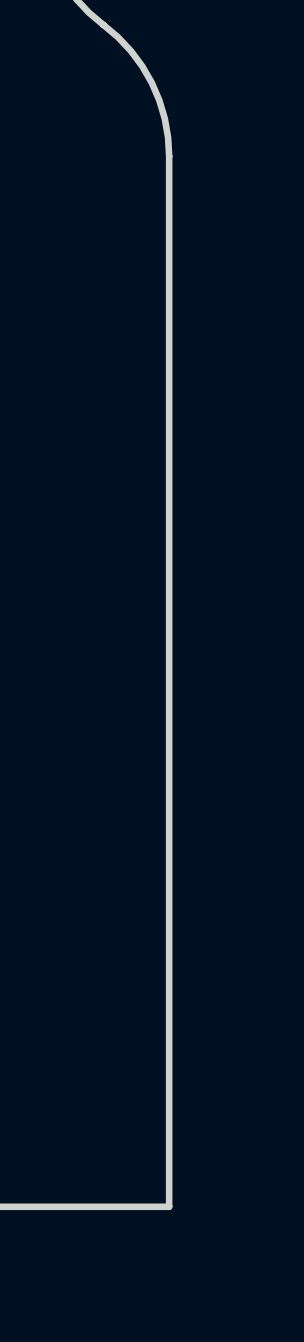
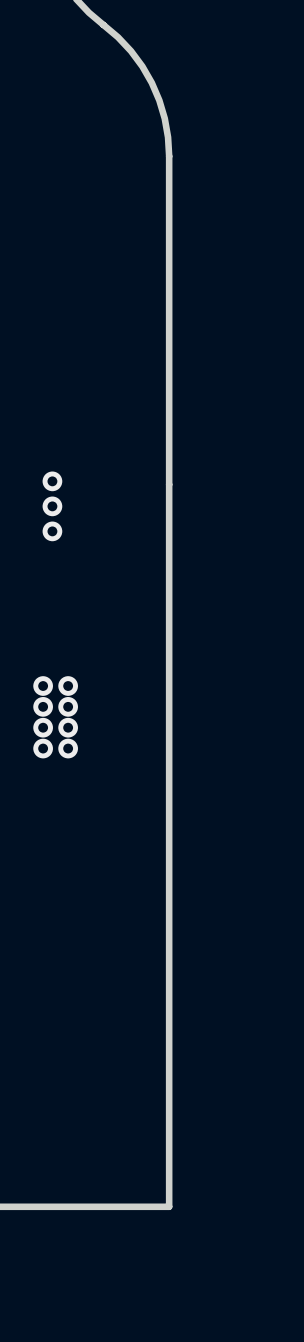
via: none -> (52, 481)
via: none -> (52, 506)
via: none -> (52, 531)
via: none -> (43, 686)
via: none -> (68, 686)
via: none -> (43, 706)
via: none -> (68, 706)
via: none -> (43, 727)
via: none -> (68, 727)
via: none -> (43, 748)
via: none -> (68, 748)

